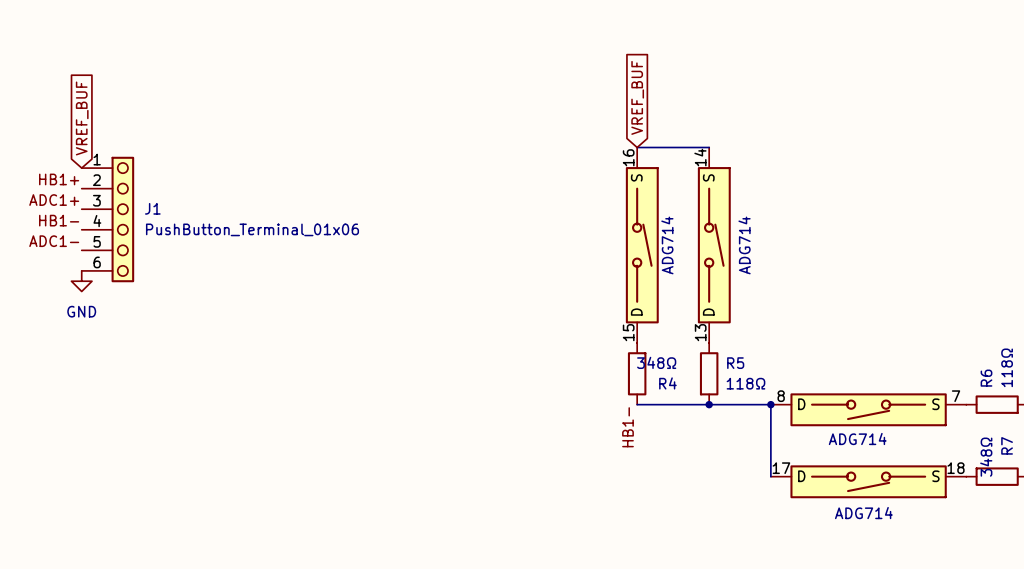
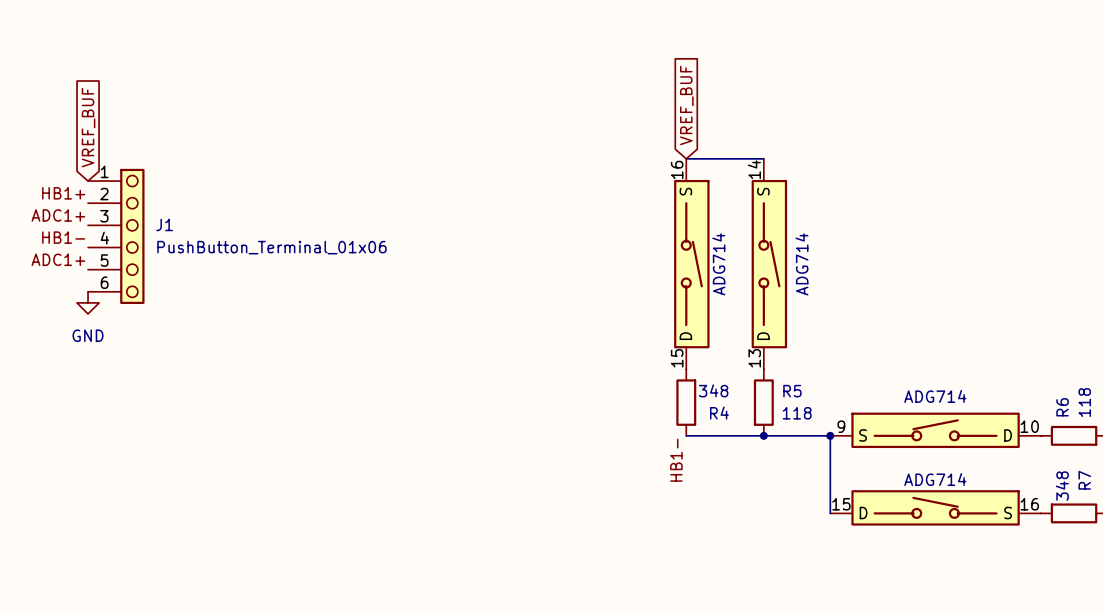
label: ADC1- (54, 241) -> ADC1+ (58, 259)
R4 value: 348Ω (656, 362) -> 348 (713, 390)
R6 value: 118Ω (1007, 367) -> 118 (1084, 402)
R5 value: 118Ω (745, 383) -> 118 (797, 413)
part: none -> ADG714 (935, 430)
part: ADG714 (868, 409) -> none
R7 value: 348Ω (986, 457) -> 348 (1062, 486)
part: none -> ADG714 (935, 507)
part: ADG714 (868, 481) -> none

